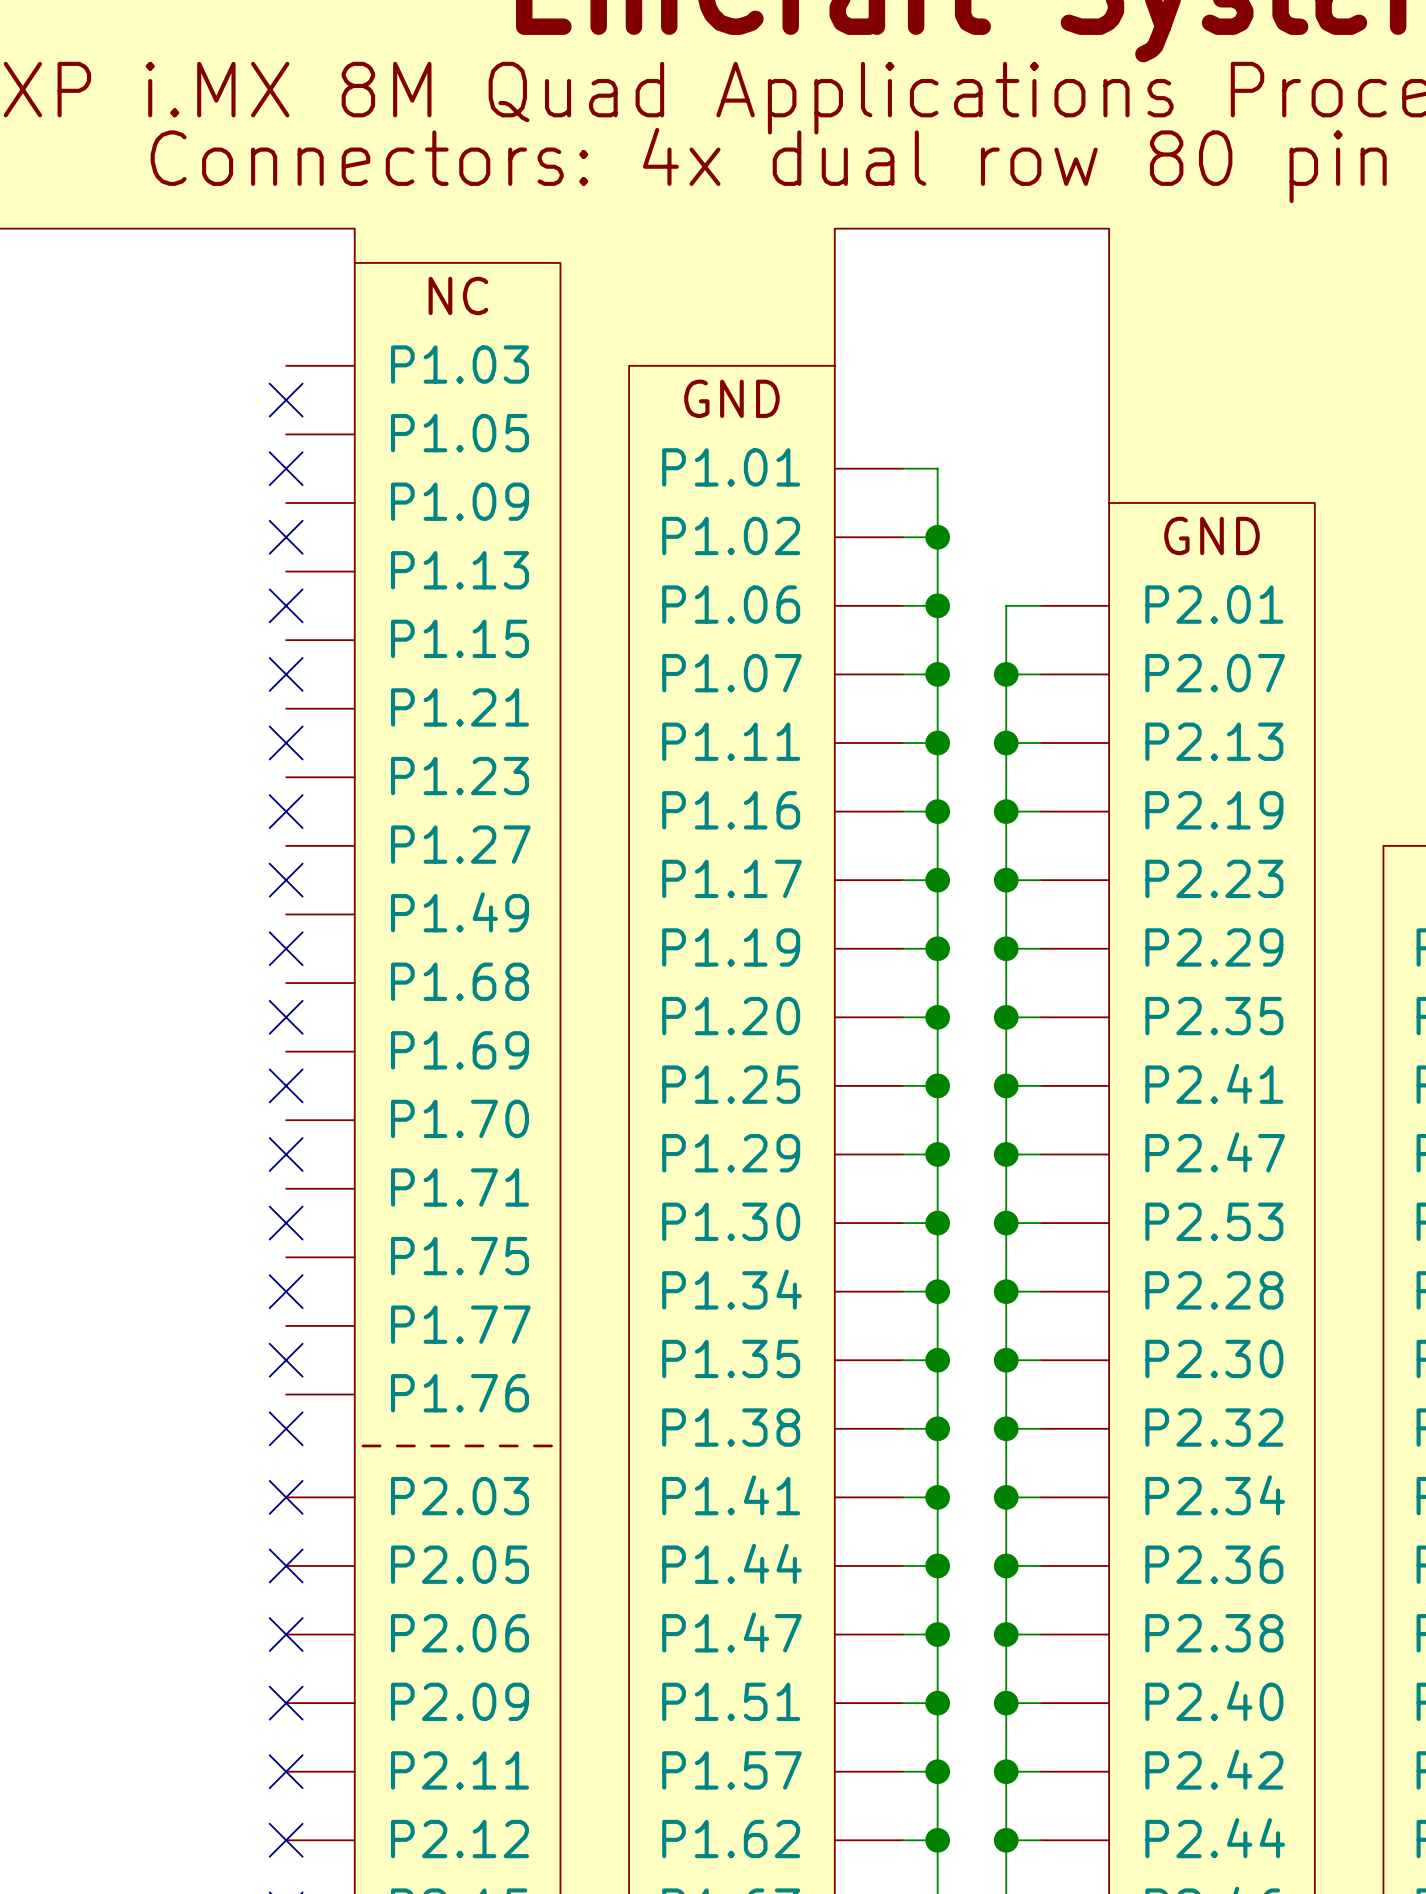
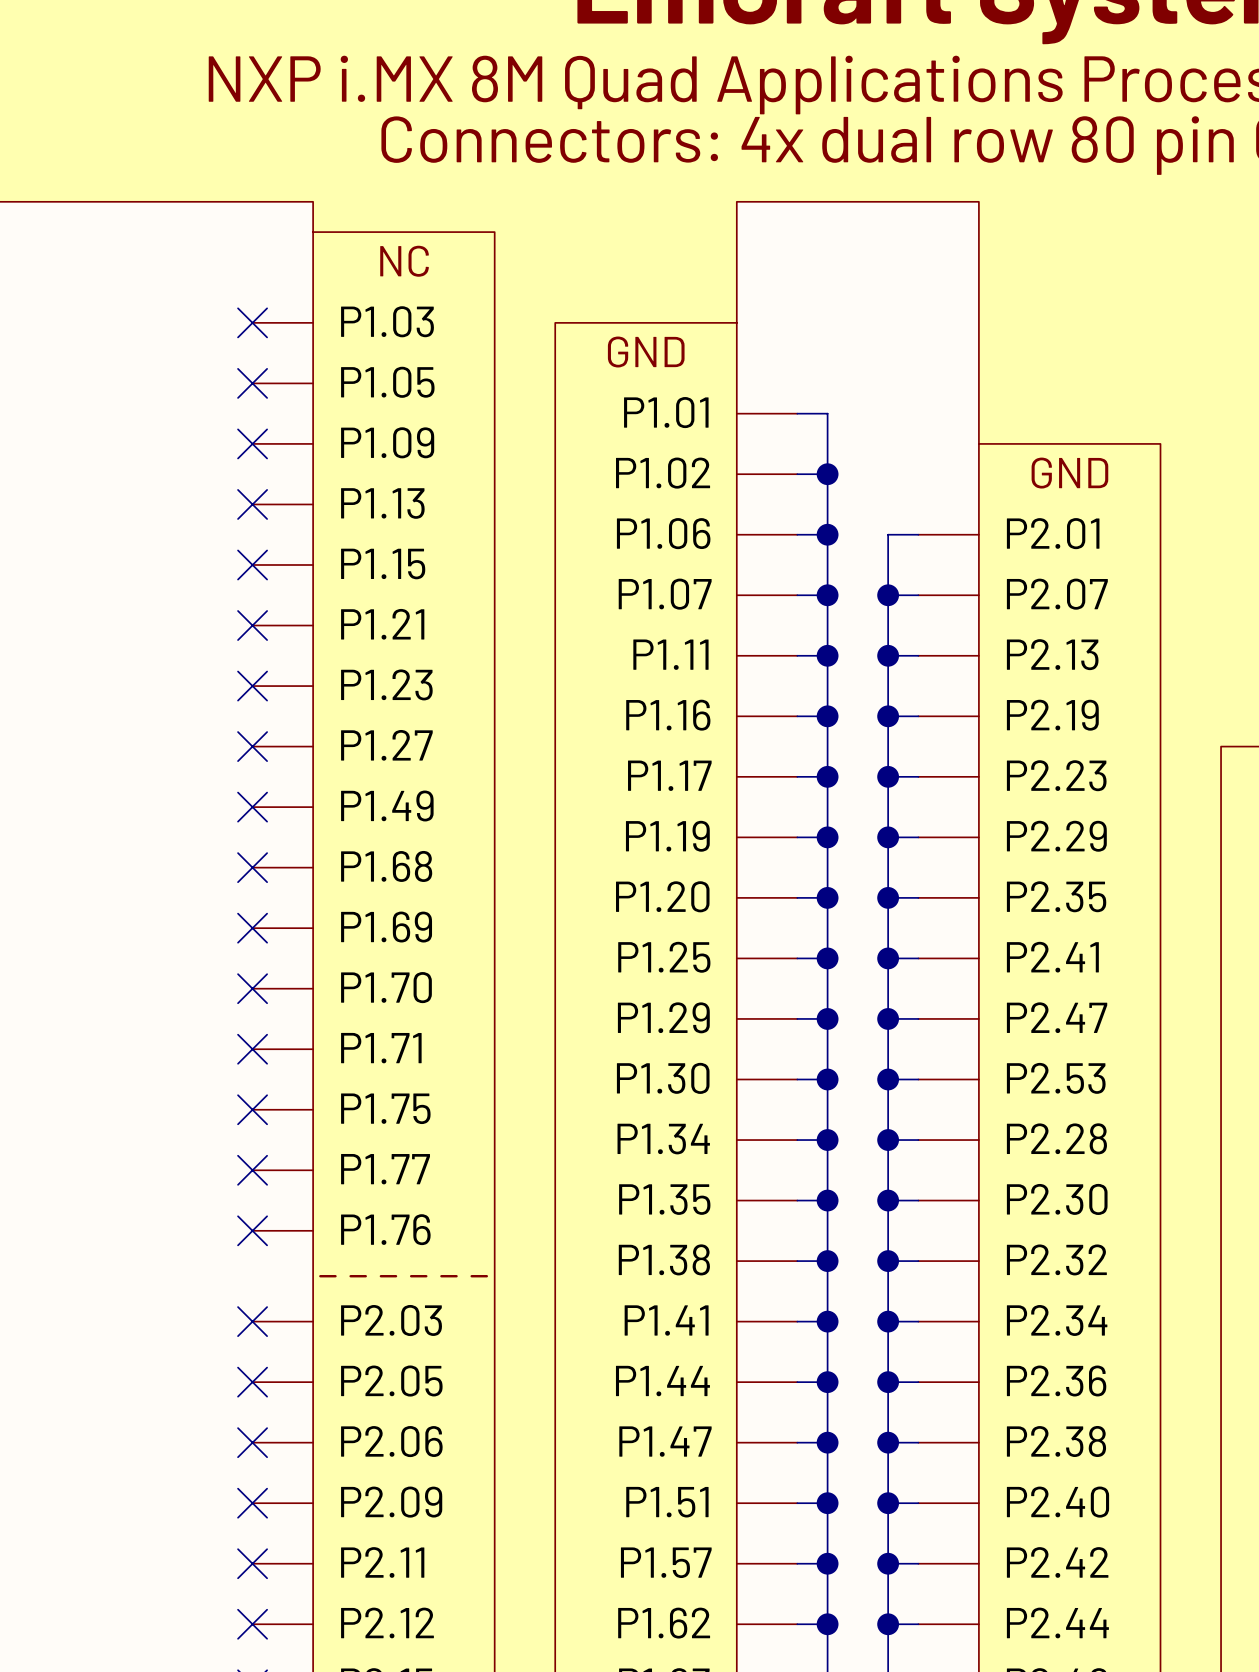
no-connect mark: none -> (252, 322)
no-connect mark: (286, 400) -> none
no-connect mark: none -> (252, 383)
no-connect mark: (286, 468) -> none
no-connect mark: none -> (252, 443)
no-connect mark: (286, 537) -> none
no-connect mark: none -> (252, 504)
no-connect mark: (286, 605) -> none
no-connect mark: none -> (252, 564)
no-connect mark: (286, 674) -> none
no-connect mark: none -> (252, 625)
no-connect mark: (286, 743) -> none
no-connect mark: none -> (252, 686)
no-connect mark: (286, 811) -> none
no-connect mark: none -> (252, 746)
no-connect mark: (286, 880) -> none
no-connect mark: none -> (252, 807)
no-connect mark: (286, 948) -> none
no-connect mark: none -> (252, 867)
no-connect mark: (286, 1017) -> none
no-connect mark: none -> (252, 928)
no-connect mark: (286, 1085) -> none
no-connect mark: none -> (252, 988)
no-connect mark: (286, 1154) -> none
no-connect mark: none -> (252, 1049)
no-connect mark: (286, 1223) -> none
no-connect mark: none -> (252, 1109)
no-connect mark: (286, 1291) -> none
no-connect mark: none -> (252, 1170)
no-connect mark: (286, 1360) -> none
no-connect mark: none -> (252, 1230)
no-connect mark: (286, 1428) -> none

